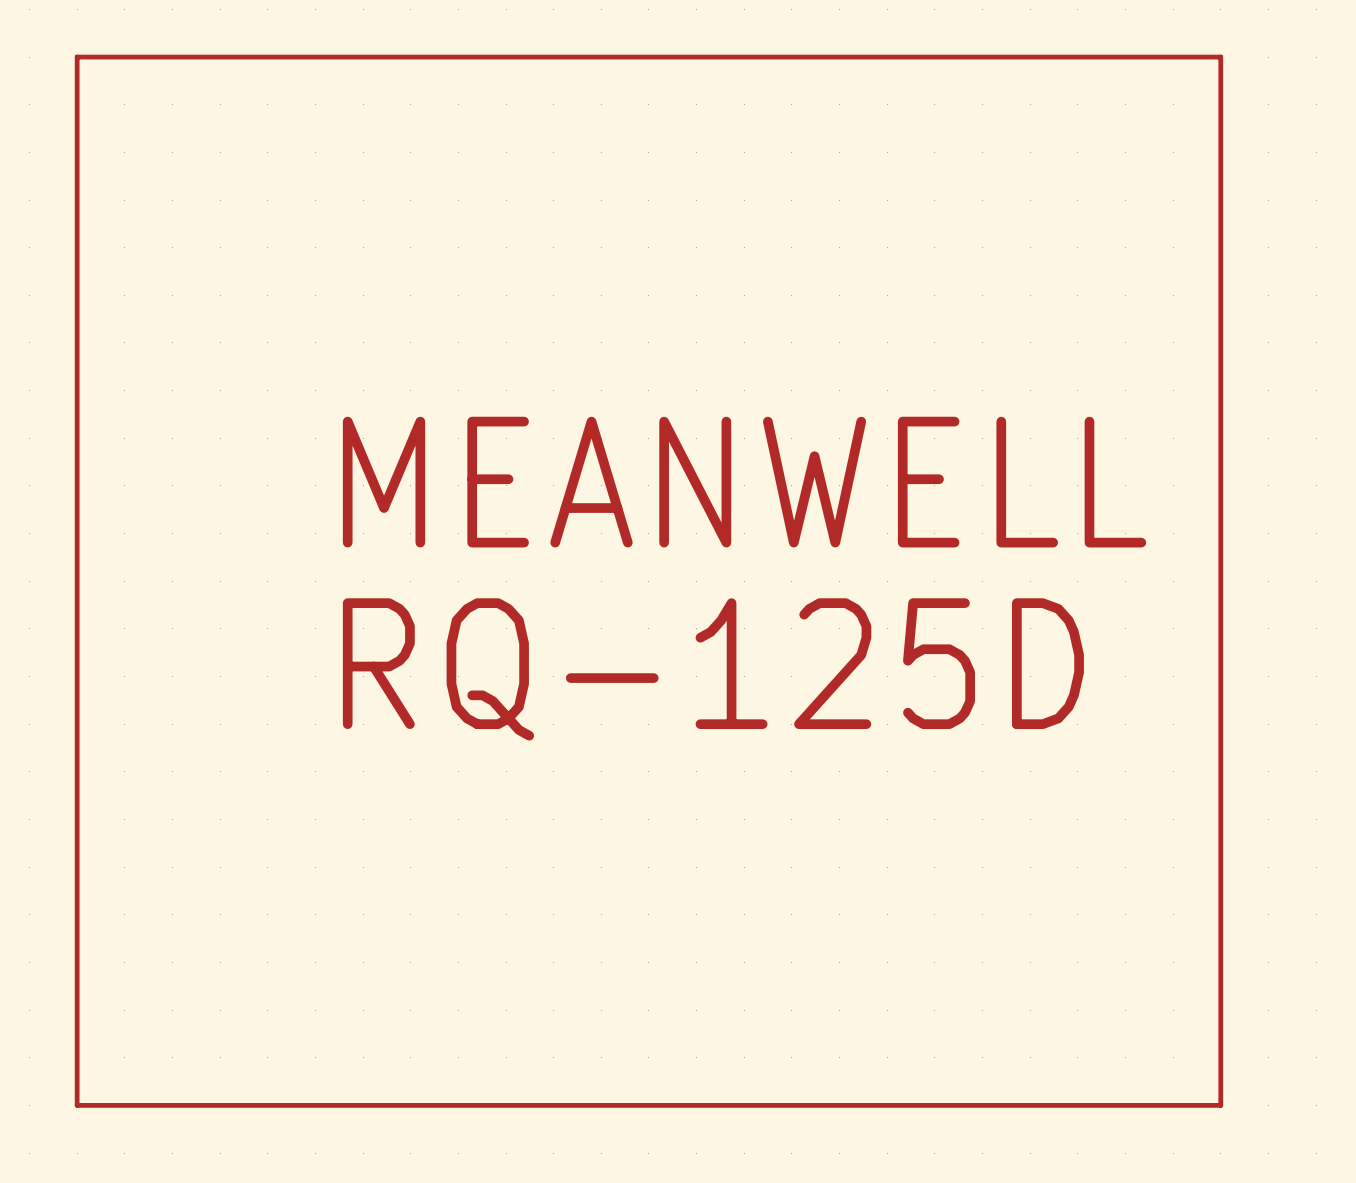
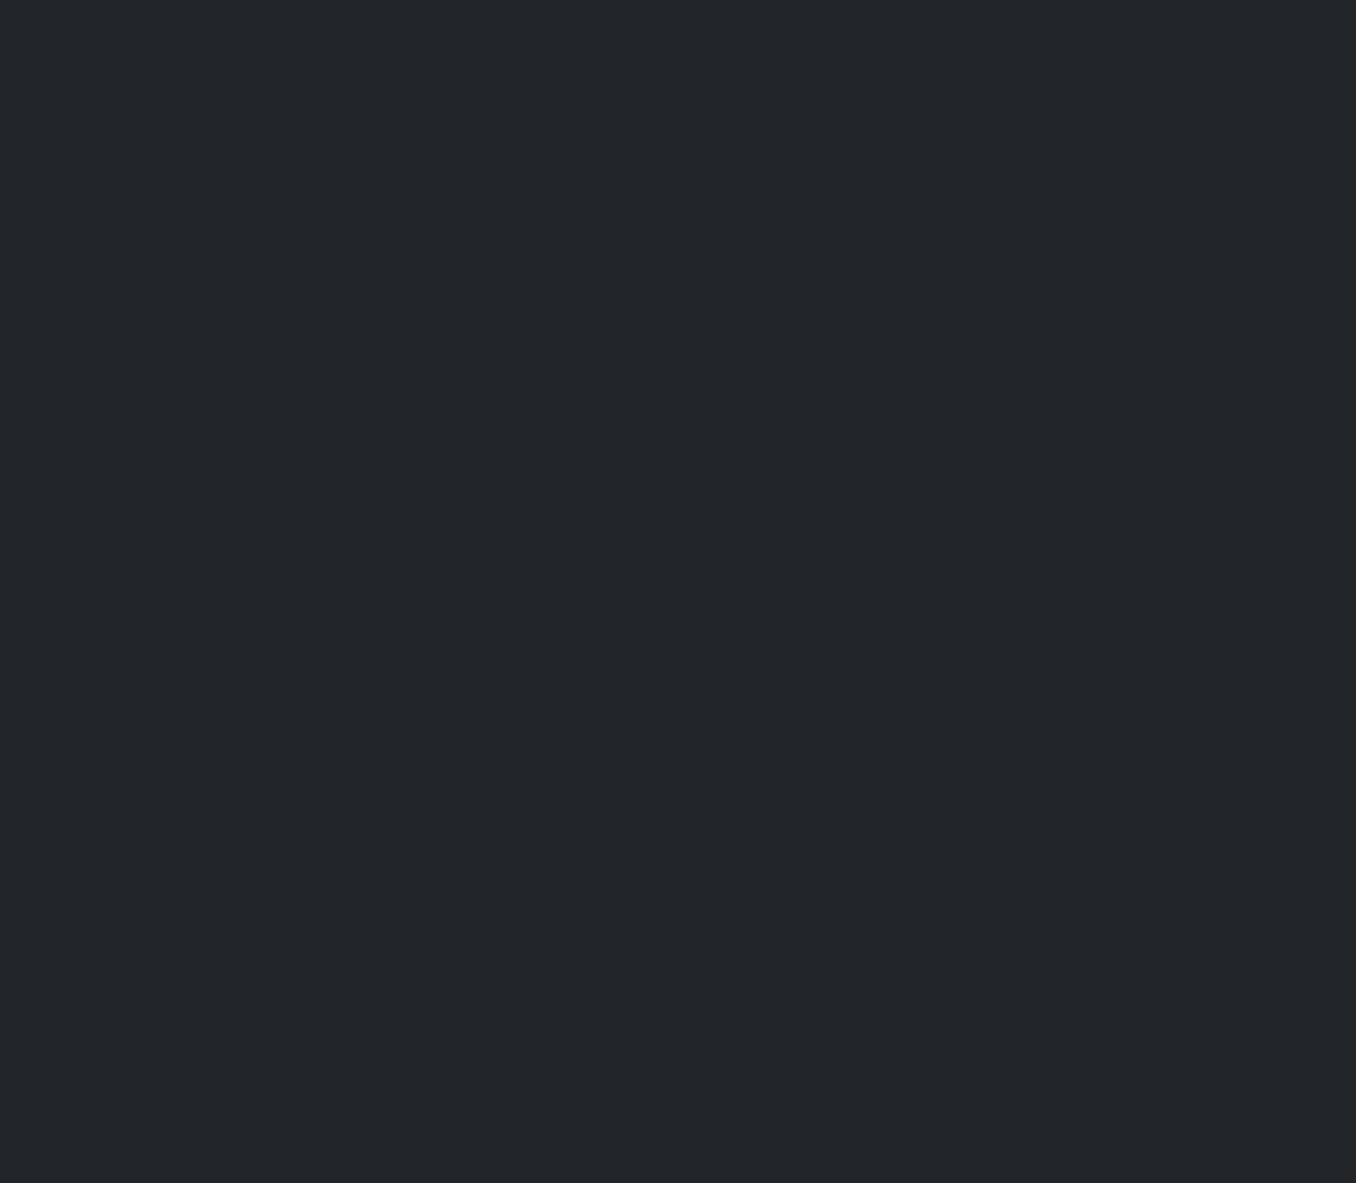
part: (648, 581) -> none

